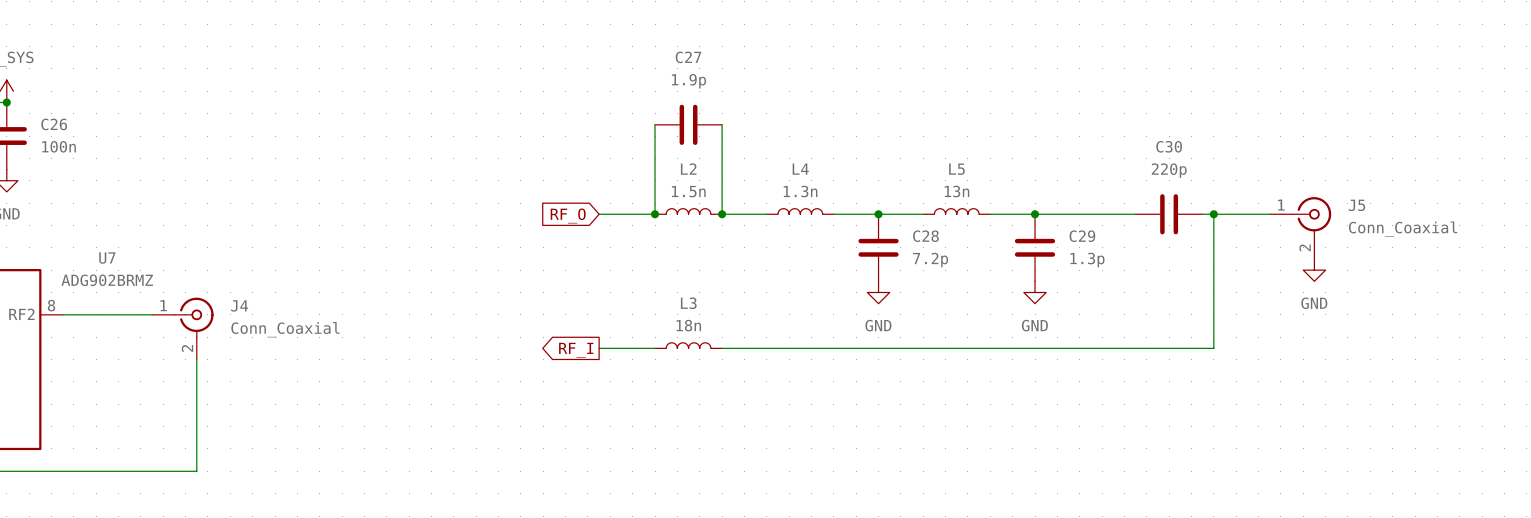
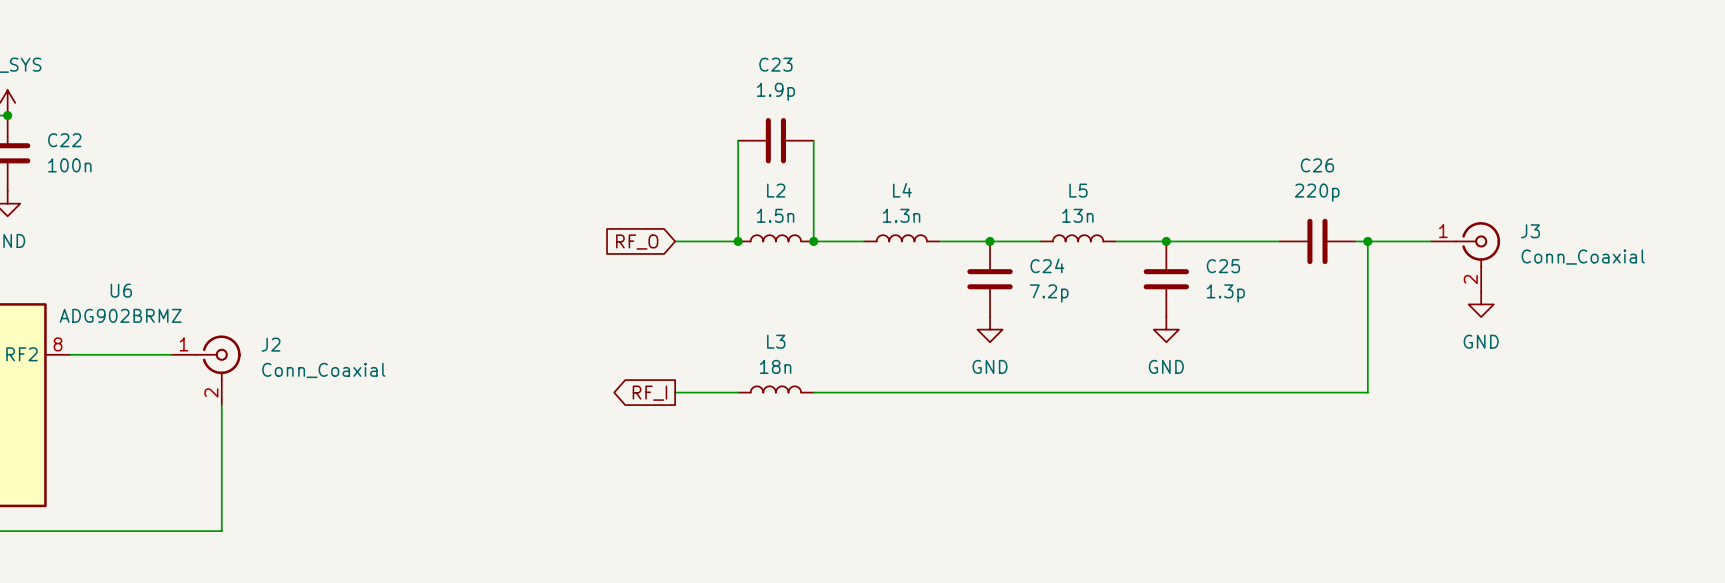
C27 name: C27 (688, 57) -> C23 (775, 64)
C26 name: C26 (54, 124) -> C22 (64, 140)
C30 name: C30 (1169, 146) -> C26 (1317, 165)
J5 name: J5 (1356, 205) -> J3 (1530, 231)
C28 name: C28 (925, 236) -> C24 (1047, 265)
C29 name: C29 (1082, 236) -> C25 (1223, 266)
U7 name: U7 (107, 258) -> U6 (121, 290)
J4 name: J4 (239, 305) -> J2 (271, 344)

